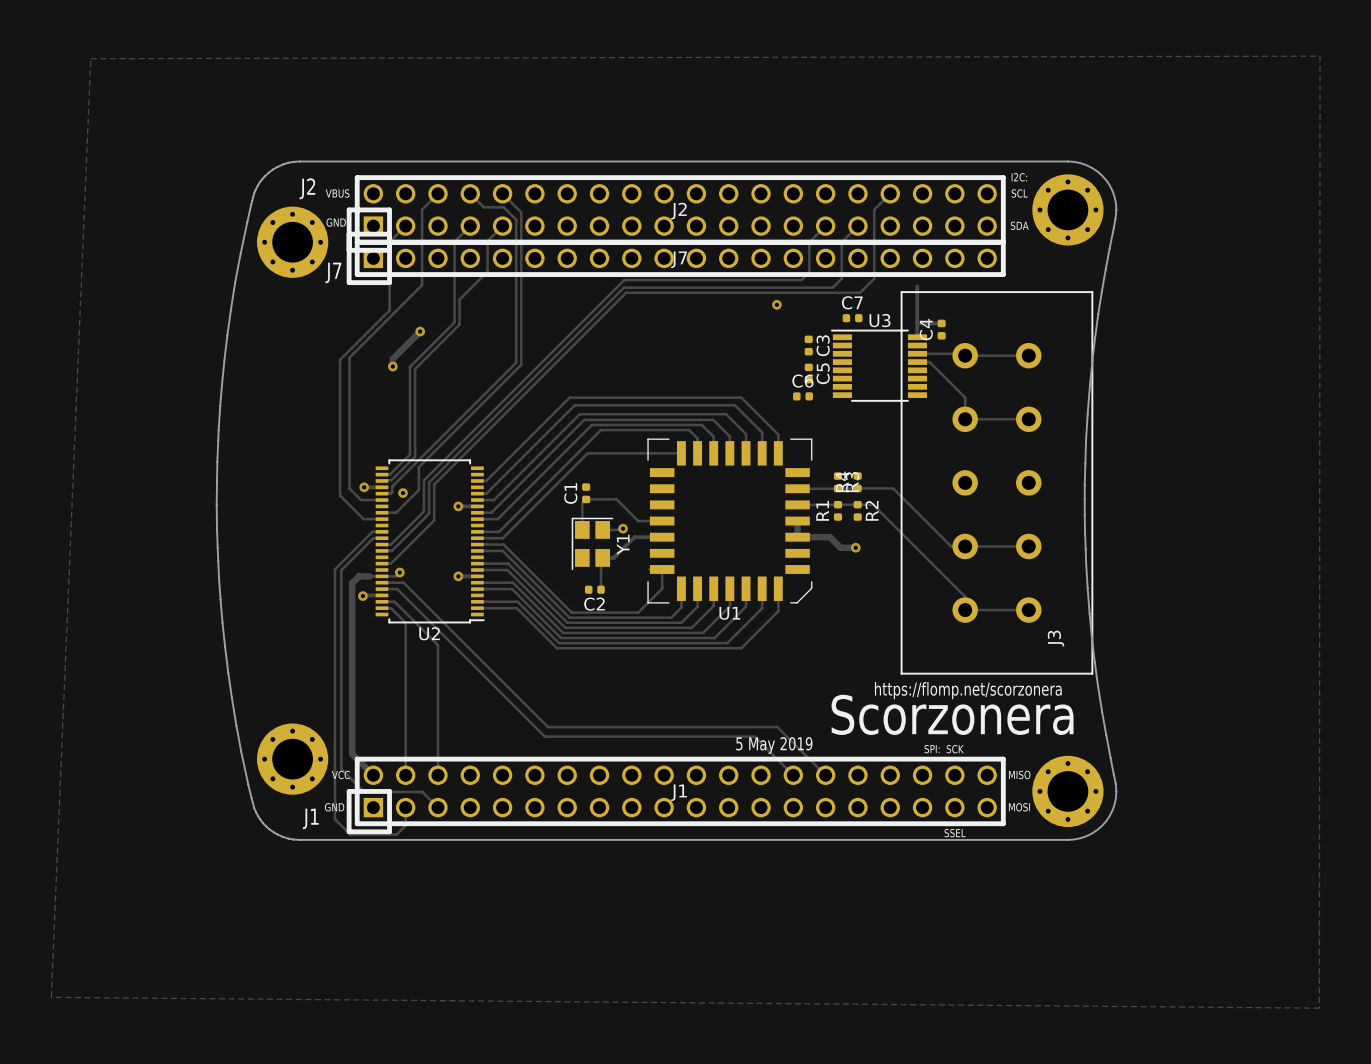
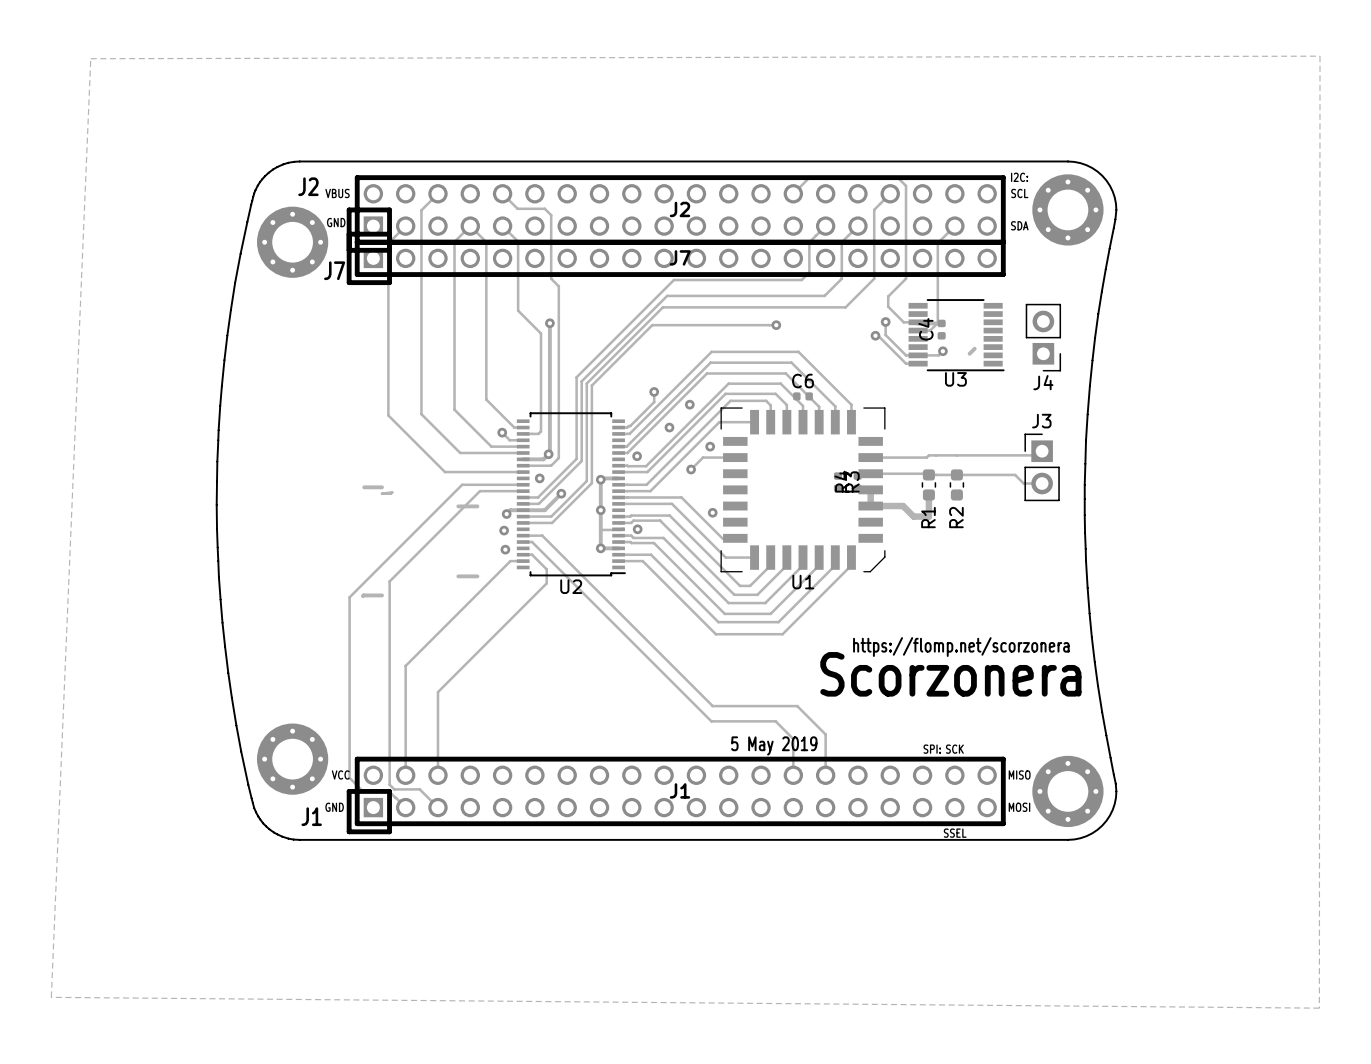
track: (470, 193) (483, 207) (503, 207) (516, 219) (516, 362) (392, 486) (392, 492) -> none
track: none -> (793, 193) (810, 177) (897, 177) (906, 185) (906, 278) (888, 296) (888, 306) (903, 322) (918, 322)
track: (517, 208) (521, 212) (521, 364) (418, 467) (418, 489) (396, 512) (382, 512) -> (517, 208) (544, 208) (551, 215) (551, 278) (558, 286) (558, 458)
track: (422, 209) (422, 285) (349, 357) (349, 488) (361, 500) (382, 500) -> (422, 209) (421, 414) (460, 452) (523, 452)
track: none -> (470, 226) (486, 242) (486, 399) (514, 427) (523, 427)
track: (502, 226) (487, 241) (487, 271) (459, 299) (459, 324) (415, 369) (415, 456) (391, 480) (382, 480) -> (502, 226) (518, 241) (518, 310) (541, 333) (541, 431) (538, 433) (523, 433)
track: none -> (954, 226) (937, 243) (937, 322) (930, 330) (918, 330)
track: (389, 242) (389, 310) (340, 359) (340, 495) (363, 519) (382, 519) -> (389, 242) (388, 415) (444, 472) (523, 472)
track: (673, 280) (624, 280) (423, 480) (423, 511) (390, 544) (382, 544) -> (673, 280) (576, 377) (576, 458) (538, 497) (523, 497)
track: (917, 286) (917, 337) -> none
track: (832, 287) (623, 287) (429, 482) (429, 513) (391, 550) (382, 550) -> (832, 287) (824, 295) (667, 295) (581, 381) (581, 461) (538, 503) (523, 503)
J3 footprint: [900, 291, 1094, 675] -> [1024, 433, 1060, 502]
track: (860, 292) (626, 292) (434, 484) (434, 520) (390, 563) (382, 563) -> (860, 292) (845, 307) (662, 307) (586, 383) (586, 481) (551, 516) (523, 516)
via position: (776, 304) -> (776, 325)
C7: (852, 318) -> none
track: none -> (885, 321) (885, 335) (906, 355) (938, 355) (942, 351)
via: none -> (885, 321)
track: (454, 322) (410, 366) (410, 454) (389, 474) (382, 474) -> (454, 322) (454, 409) (491, 446) (523, 446)
track: none -> (549, 323) (549, 452) (543, 459) (523, 459)
via: none -> (549, 323)
track: none -> (776, 325) (652, 325) (591, 385) (591, 483) (552, 522) (523, 522)
track: (420, 331) (392, 358) (392, 366) -> none
via: (420, 331) -> none
track: none -> (875, 335) (878, 335) (906, 363) (918, 363)
via: none -> (875, 335)
J4: none -> (1043, 337)
C3: (808, 345) -> none
via: none -> (942, 351)
track: (917, 353) (1028, 355) -> none
track: (917, 362) (929, 362) (965, 397) (965, 419) (1028, 419) -> none
U3 rotation: 0° (879, 365) -> 180° (956, 335)
U3 position: (879, 365) -> (956, 335)
via: (392, 366) -> none
C5: (808, 373) -> none
track: none -> (654, 391) (654, 402) (630, 426) (618, 427)
via: none -> (654, 391)
via: none -> (689, 404)
track: none -> (754, 422) (719, 422) (650, 491) (618, 491)
track: none -> (770, 422) (770, 405) (766, 400) (730, 400) (646, 484) (618, 484)
track: none -> (786, 422) (786, 405) (775, 393) (725, 393) (647, 472) (618, 472)
track: none -> (803, 422) (803, 405) (780, 383) (728, 383) (646, 466) (618, 465)
track: none -> (819, 422) (819, 406) (785, 373) (706, 373) (627, 452) (618, 452)
track: none -> (835, 422) (835, 406) (791, 362) (710, 362) (626, 446) (618, 446)
track: none -> (851, 422) (851, 404) (798, 351) (711, 351) (629, 433) (618, 433)
via: none -> (669, 427)
track: none -> (502, 432) (509, 440) (523, 440)
via: none -> (502, 432)
via: none -> (710, 446)
track: none -> (1042, 451) (1037, 455) (870, 457)
track: (681, 453) (587, 453) (502, 538) (477, 538) -> none
track: (697, 453) (697, 438) (689, 430) (600, 430) (499, 531) (477, 531) -> none
track: (713, 453) (713, 436) (701, 425) (591, 425) (558, 458) -> none
track: (729, 453) (729, 436) (713, 419) (584, 419) (491, 512) (477, 512) -> none
track: (746, 453) (746, 434) (726, 414) (579, 414) (493, 500) (477, 500) -> none
track: (762, 453) (762, 432) (734, 405) (574, 405) (486, 493) (477, 493) -> none
track: (778, 453) (778, 434) (741, 397) (569, 397) (486, 480) (477, 480) -> none
via: none -> (548, 454)
via: none -> (637, 456)
track: none -> (735, 457) (703, 457) (691, 469)
track: (551, 465) (497, 519) (477, 519) -> (551, 465) (523, 465)
via: none -> (691, 469)
track: none -> (870, 473) (1015, 474) (1023, 483) (1042, 483)
via: none -> (539, 478)
track: none -> (618, 478) (600, 479) (600, 548) (618, 548)
via: none -> (600, 479)
via: (364, 487) -> none
track: (797, 488) (893, 488) (951, 546) (1028, 546) -> none
track: none -> (870, 489) (870, 506) (903, 506) (913, 516) (928, 516) (928, 494)
via: (403, 493) -> none
track: none -> (561, 493) (544, 510) (510, 510) (506, 514)
via: none -> (561, 493)
C1: (586, 493) -> none
track: none -> (618, 497) (681, 497) (722, 538) (735, 538)
R1 footprint: [833, 500, 843, 521] -> [921, 469, 937, 501]
R2 footprint: [853, 500, 862, 521] -> [949, 469, 965, 501]
track: none -> (618, 503) (672, 503) (725, 557) (754, 557)
track: (797, 504) (873, 504) (965, 596) (965, 610) (1028, 610) -> none
via: (458, 506) -> none
via: none -> (600, 510)
R1 name position: R1 (822, 510) -> R1 (928, 517)
R2 name position: R2 (871, 510) -> R2 (956, 517)
via: none -> (712, 512)
via: none -> (506, 514)
track: none -> (618, 516) (669, 515) (740, 585) (750, 585) (770, 565) (770, 557)
track: (662, 521) (638, 521) (616, 499) (586, 499) (582, 503) (582, 529) -> none
U1 position: (729, 521) -> (803, 489)
track: (797, 521) (797, 537) (829, 537) (840, 547) (855, 547) -> none
track: none -> (618, 522) (660, 520) (734, 594) (757, 594) (786, 565) (786, 557)
via: (623, 528) -> none
via: none -> (637, 529)
via: none -> (504, 530)
track: (382, 531) (372, 531) (334, 569) (334, 819) (350, 834) (396, 834) (405, 825) (405, 807) -> (523, 484) (462, 484) (349, 597) (349, 777) (362, 790) (388, 790) (405, 807)
track: none -> (618, 535) (631, 535) (633, 537) (663, 537) (728, 603) (765, 603) (803, 565) (803, 557)
track: (662, 537) (634, 537) (613, 557) (602, 557) (601, 559) (601, 589) -> none
track: (382, 538) (373, 538) (341, 570) (341, 769) (364, 791) (422, 791) -> (523, 491) (479, 491) (389, 581) (389, 784) (394, 789) (419, 789) (422, 791)
U2 position: (430, 541) -> (571, 494)
track: none -> (618, 542) (653, 543) (724, 613) (770, 613) (819, 565) (819, 557)
Y1: (592, 543) -> none
track: (477, 544) (503, 544) (571, 612) (638, 612) (662, 588) (662, 569) (649, 569) -> none
via: (855, 547) -> none
via: none -> (600, 548)
via: none -> (505, 549)
track: (477, 550) (502, 550) (569, 617) (671, 617) (681, 607) (681, 588) -> none
track: none -> (618, 554) (651, 554) (718, 622) (778, 622) (835, 565) (835, 557)
track: none -> (851, 557) (851, 565) (782, 634) (715, 634) (642, 561) (618, 561)
track: (477, 563) (508, 563) (567, 622) (681, 622) (697, 606) (697, 588) -> none
track: (477, 570) (507, 570) (565, 627) (691, 627) (713, 605) (713, 588) -> none
track: (399, 572) (396, 576) (359, 576) (352, 583) (352, 754) (373, 775) -> none
via: (399, 572) -> none
via: (458, 576) -> none
track: (382, 582) (403, 582) (548, 727) (777, 727) (825, 775) -> (523, 535) (542, 535) (712, 706) (797, 706) (825, 734) (825, 775)
track: (477, 582) (512, 582) (563, 632) (703, 632) (729, 606) (729, 588) -> none
track: (746, 588) (746, 606) (714, 638) (561, 638) (512, 589) (477, 589) -> none
track: (762, 588) (762, 608) (727, 643) (559, 643) (517, 601) (477, 601) -> none
track: (778, 588) (778, 611) (741, 648) (556, 648) (516, 608) (477, 608) -> none
track: (382, 589) (397, 589) (544, 736) (754, 736) (793, 775) -> (523, 542) (532, 542) (711, 721) (775, 721) (793, 739) (793, 775)
C2: (594, 589) -> none
via: (362, 596) -> none
track: (382, 601) (394, 601) (437, 645) (437, 692) -> (523, 554) (532, 554) (546, 569) (546, 583) (437, 692)
track: (382, 608) (390, 608) (405, 622) (405, 665) -> (523, 561) (510, 561) (405, 665)
J3 name position: J3 (1055, 638) -> J3 (1041, 421)
text position: https://flomp.net/scorzonera (968, 690) -> https://flomp.net/scorzonera (961, 647)
text position: Scorzonera (952, 714) -> Scorzonera (950, 674)

